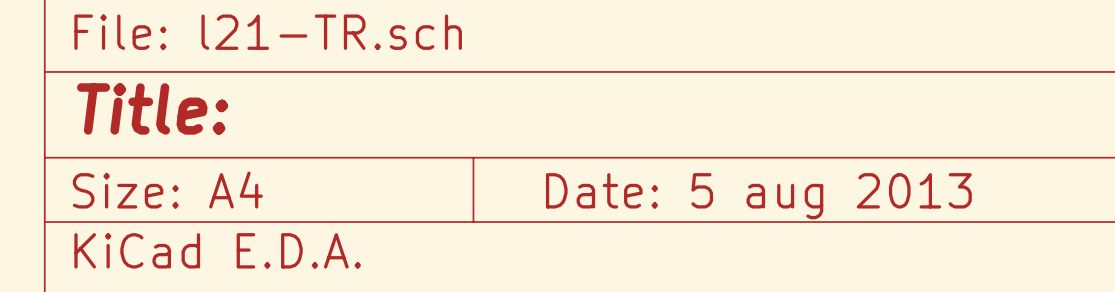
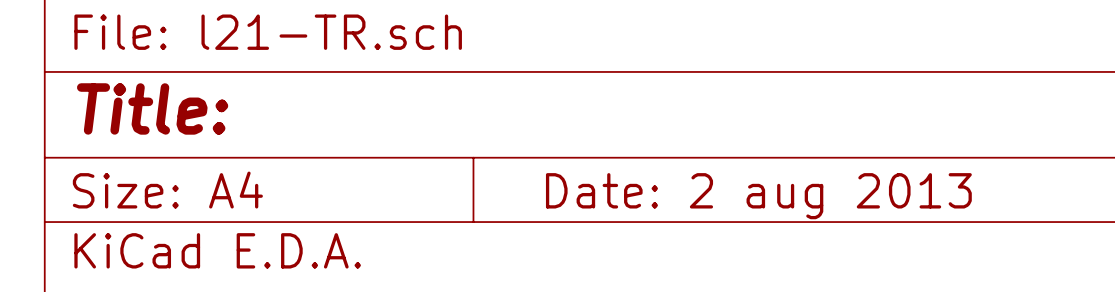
title block: Date: 5 aug 2013 (758, 196) -> Date: 2 aug 2013 (758, 196)

